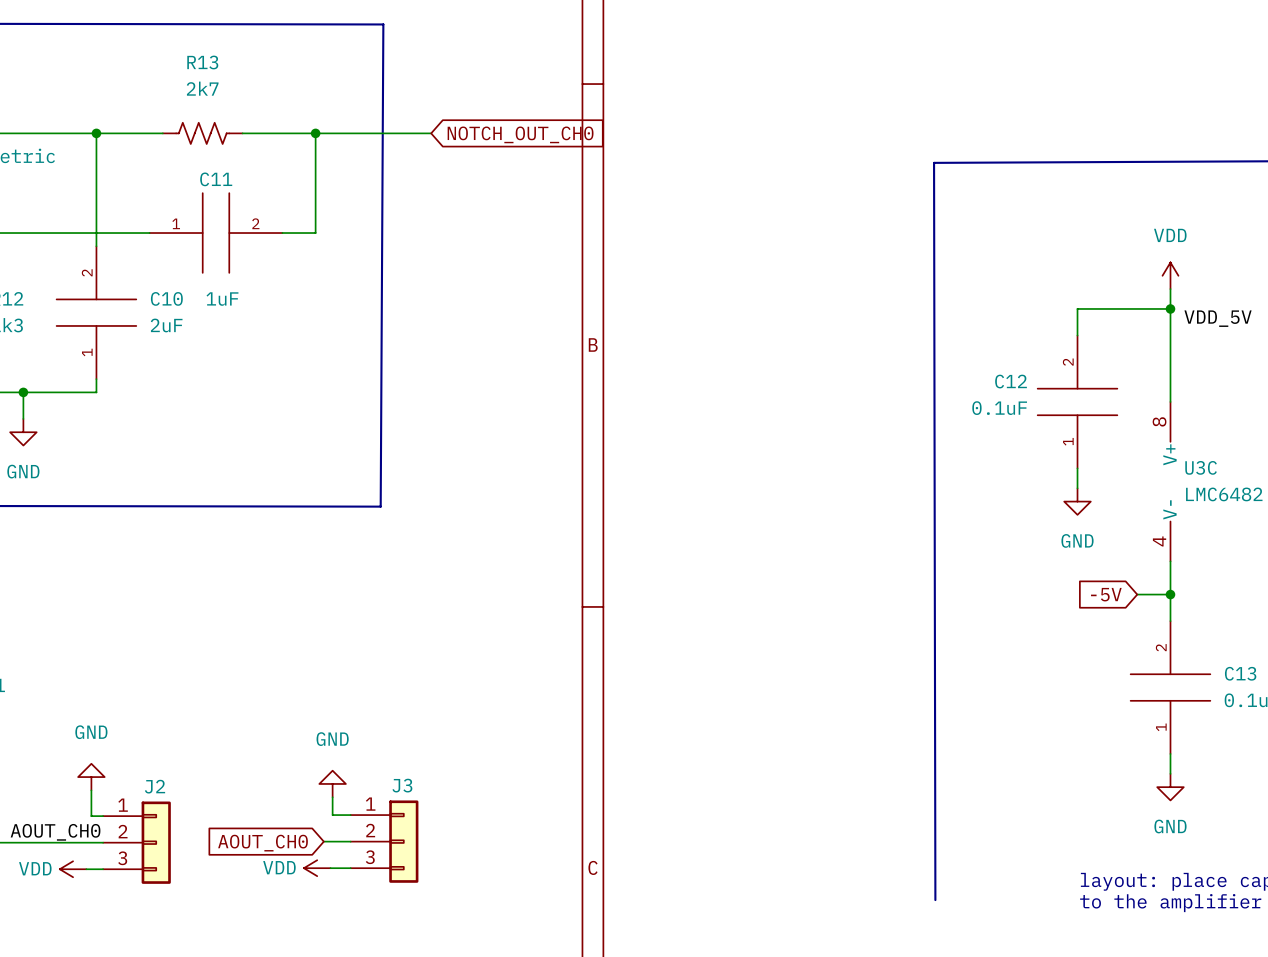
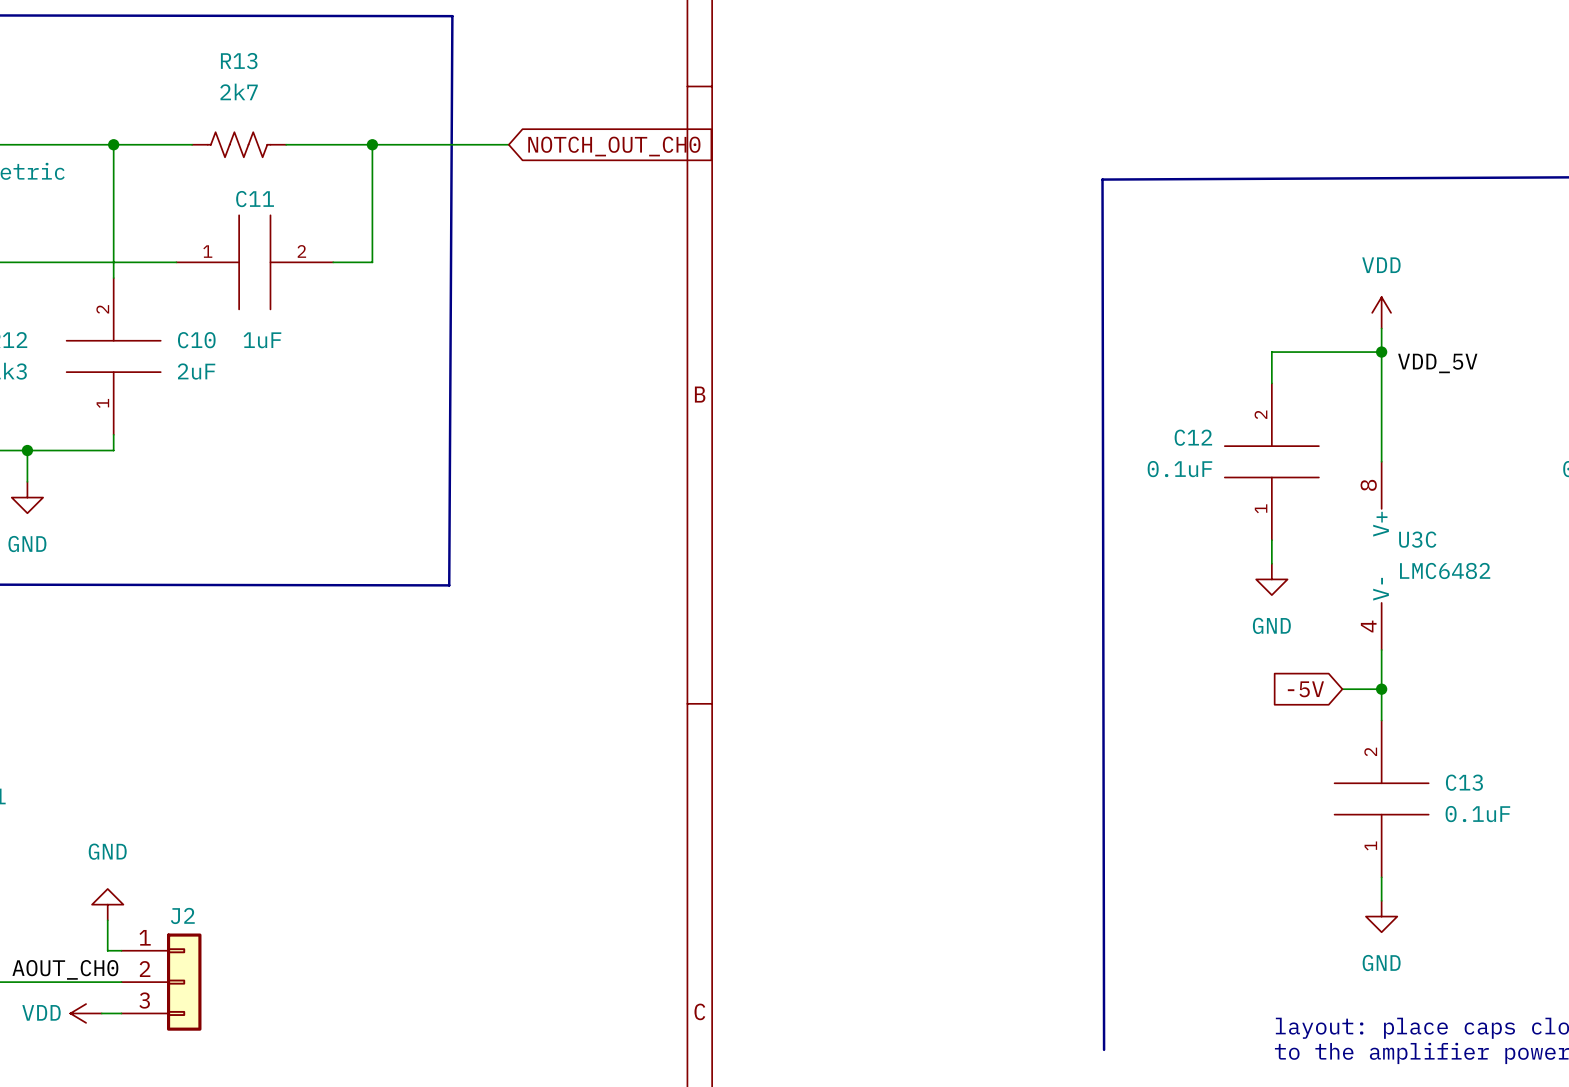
power symbol: GND (332, 783) -> none
wire: (332, 797) (332, 815) (350, 815) -> none
wire: (323, 841) (350, 841) -> none
J3: (384, 841) -> none
global label: AOUT_CH0 (263, 843) -> none
power symbol: VDD (317, 868) -> none
wire: (330, 868) (350, 868) -> none

